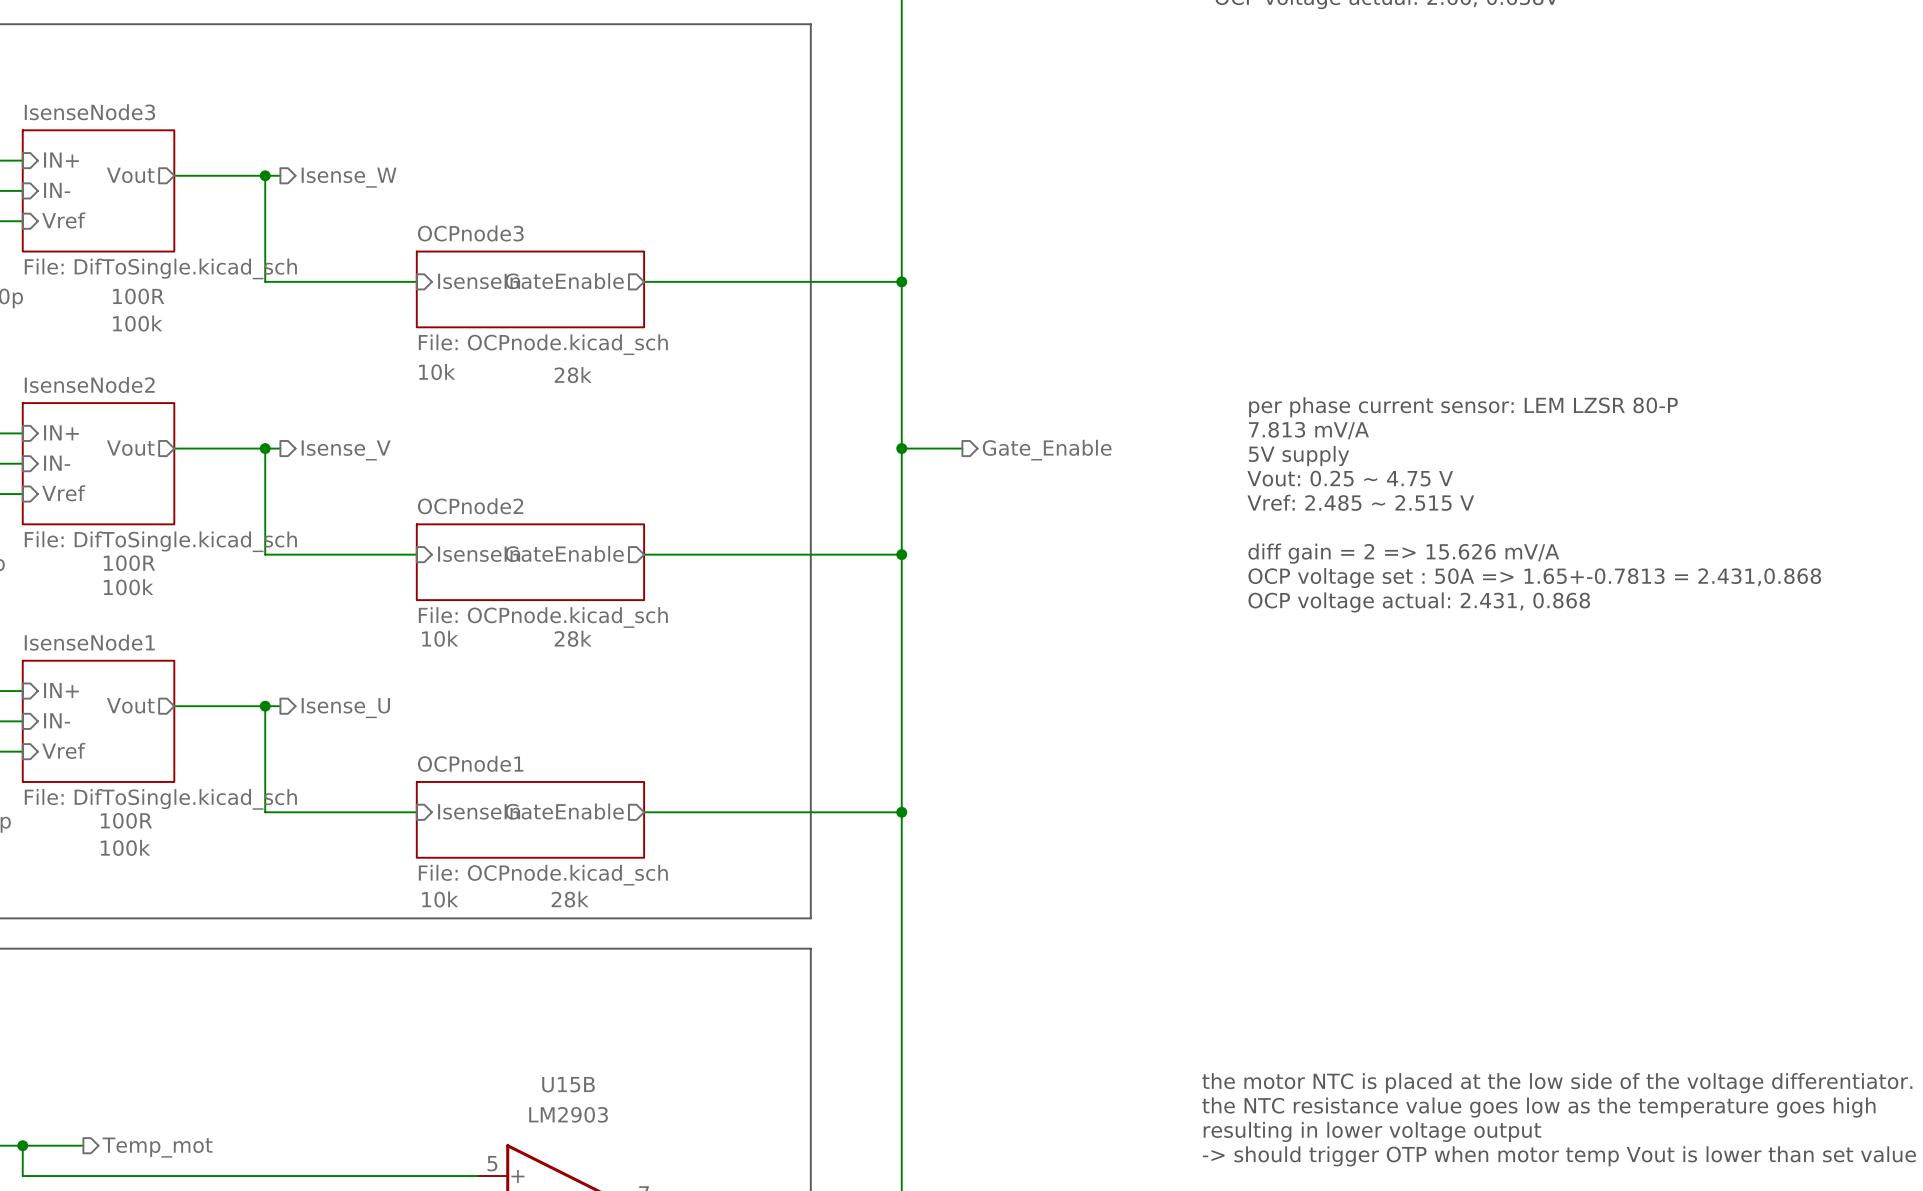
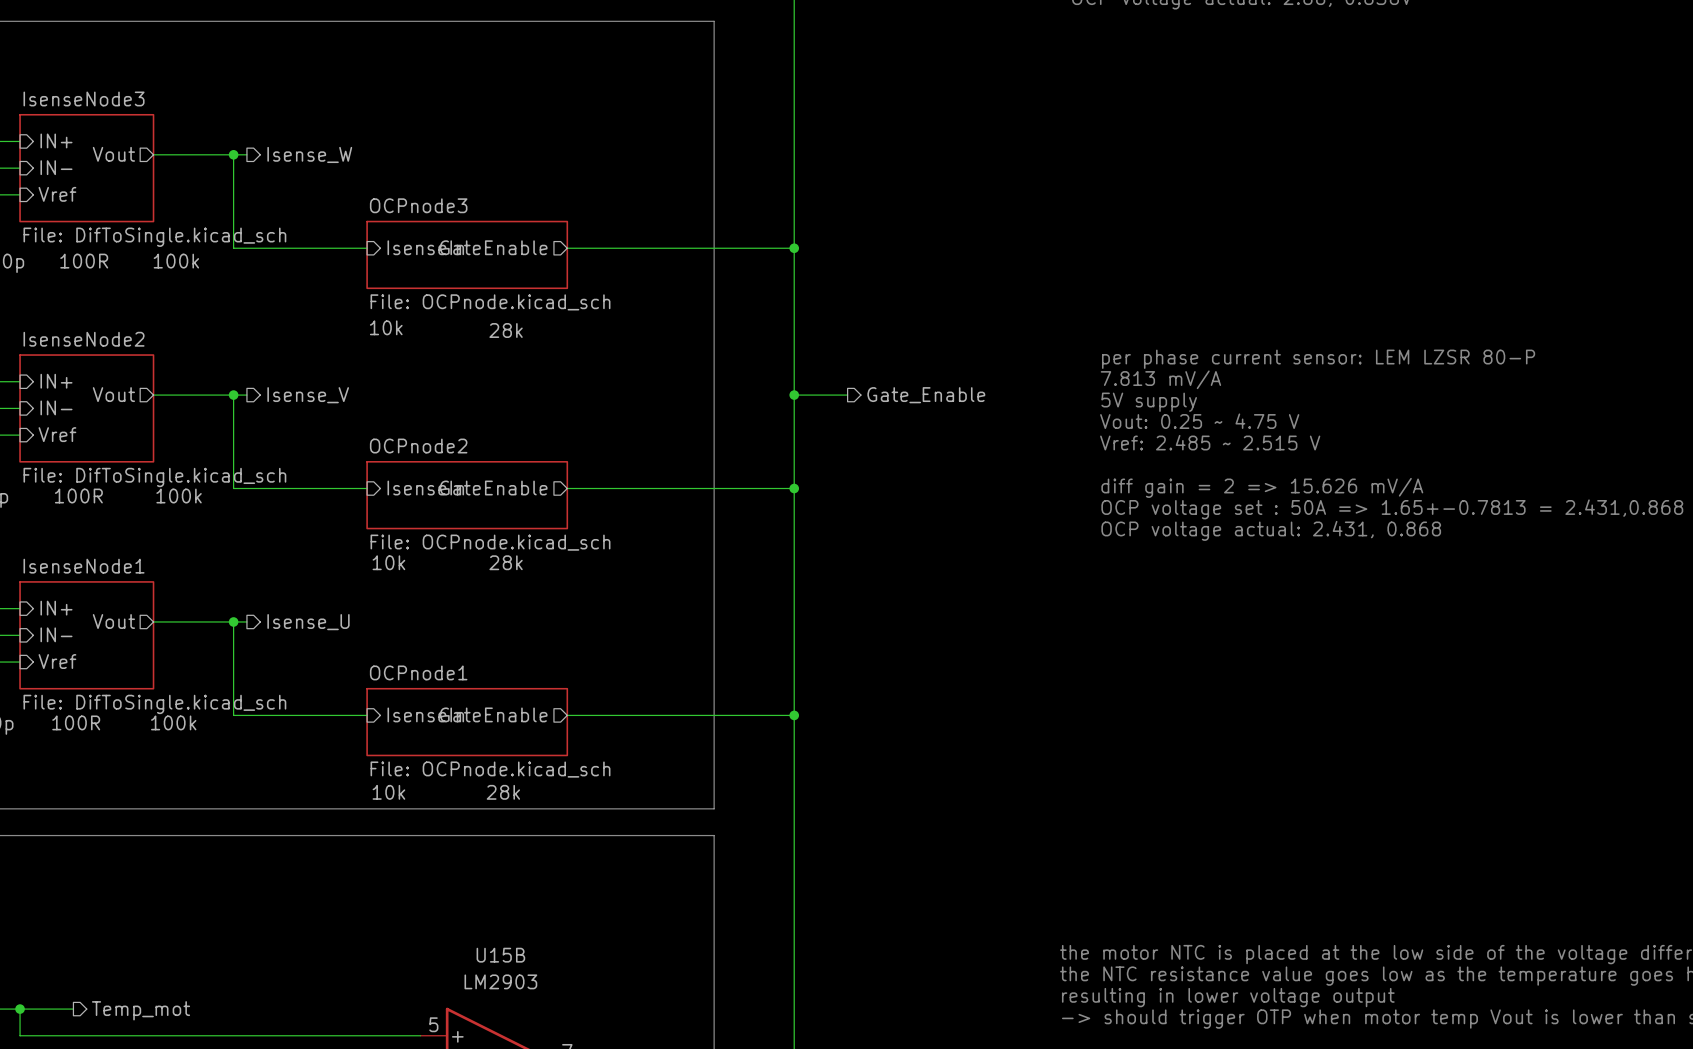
sheet IsenseNode3 text position: 100R (138, 296) -> 100R (84, 261)
sheet IsenseNode3 text position: 100k (137, 323) -> 100k (176, 261)
sheet IsenseNode2 text position: 100R (129, 563) -> 100R (78, 496)
sheet IsenseNode2 text position: 100k (128, 587) -> 100k (179, 496)
sheet IsenseNode1 text position: 100R (126, 820) -> 100R (76, 722)
sheet IsenseNode1 text position: 100k (125, 847) -> 100k (173, 722)

